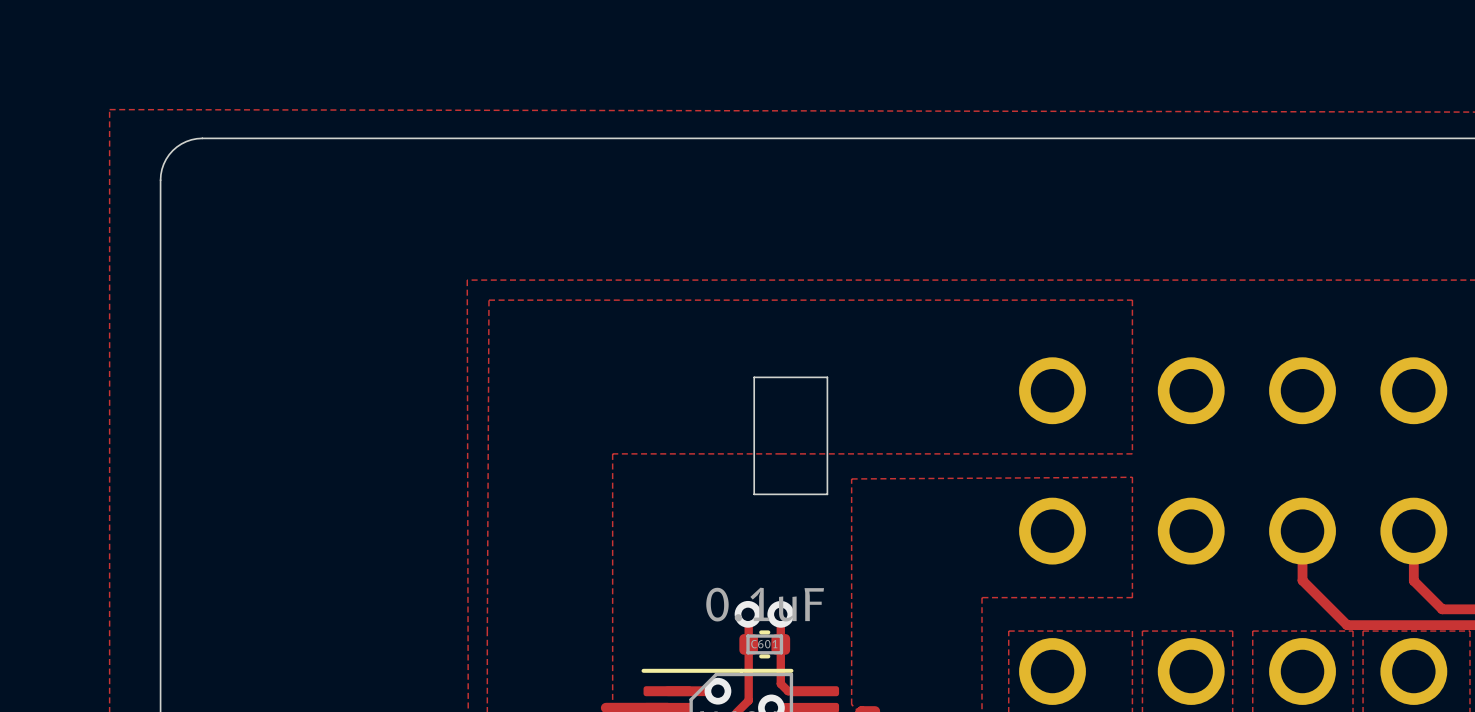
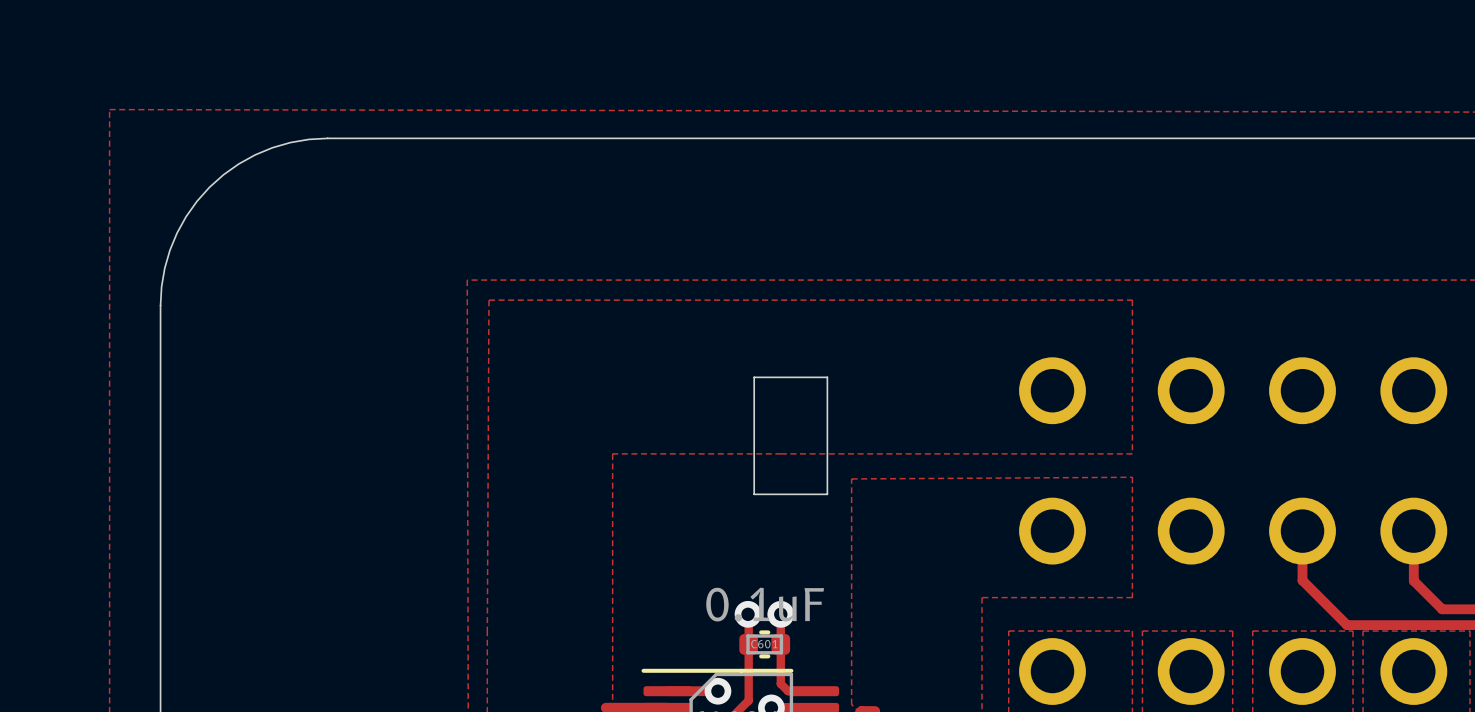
board edge: (327, 138) (196, 138) (181, 143) (172, 150) (166, 159) (160, 174) (160, 305) -> (327, 138) (308, 139) (272, 147) (238, 163) (209, 187) (186, 216) (169, 250) (161, 286) (160, 305)

